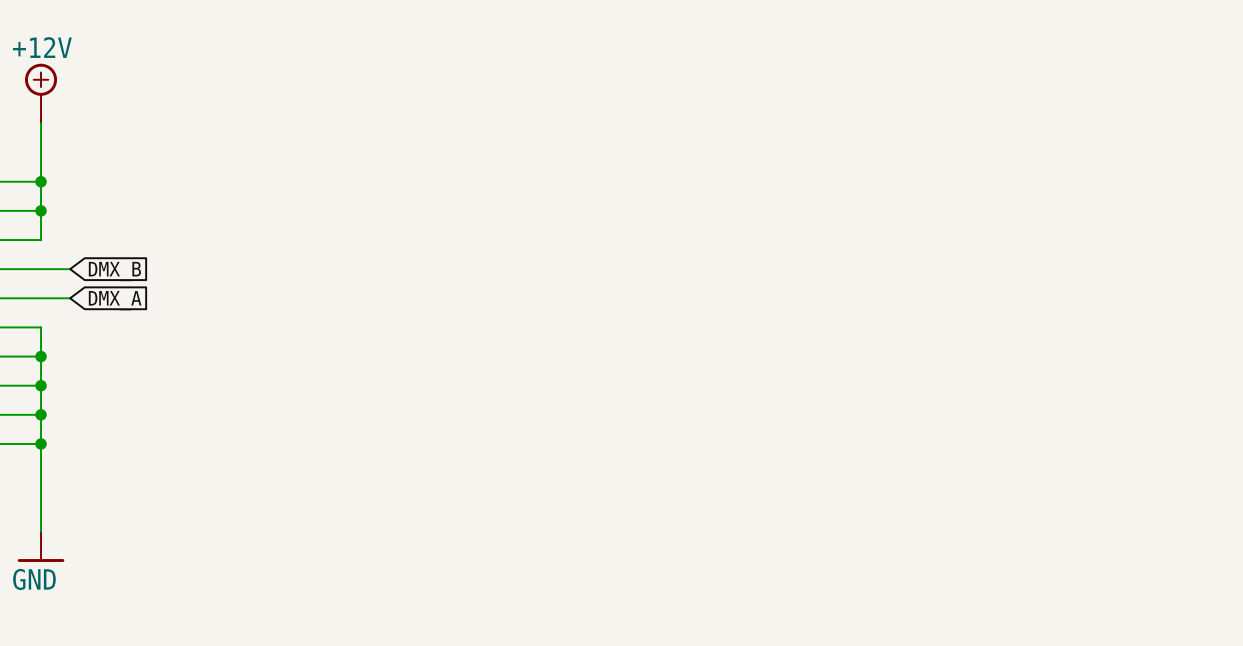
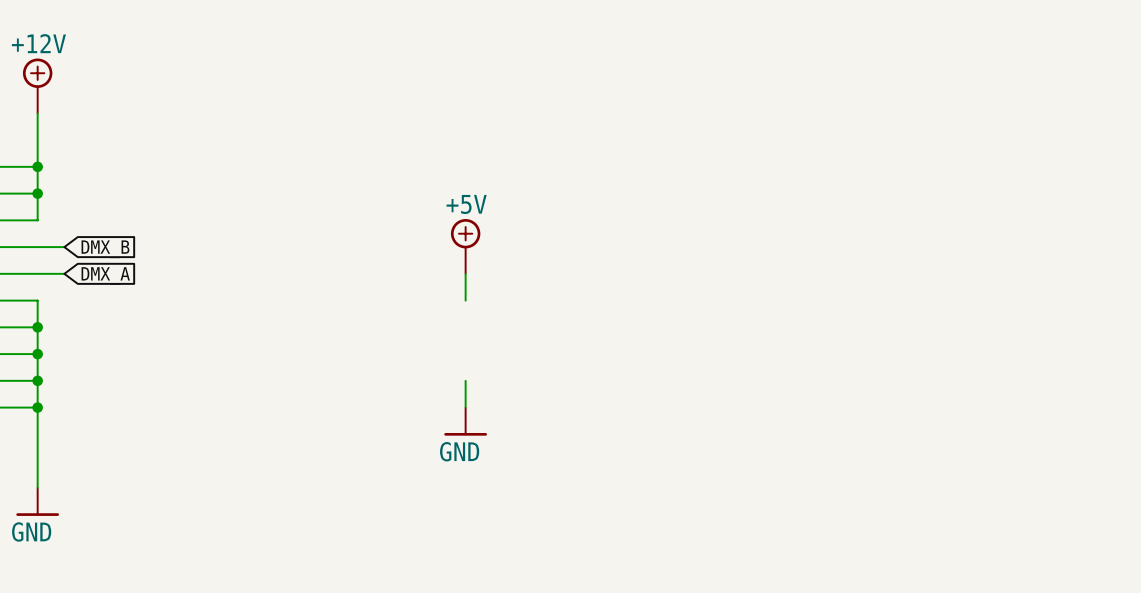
power symbol: none -> +5V (465, 246)
wire: none -> (465, 273) (465, 300)
wire: none -> (465, 380) (465, 407)
power symbol: none -> GND (465, 421)

